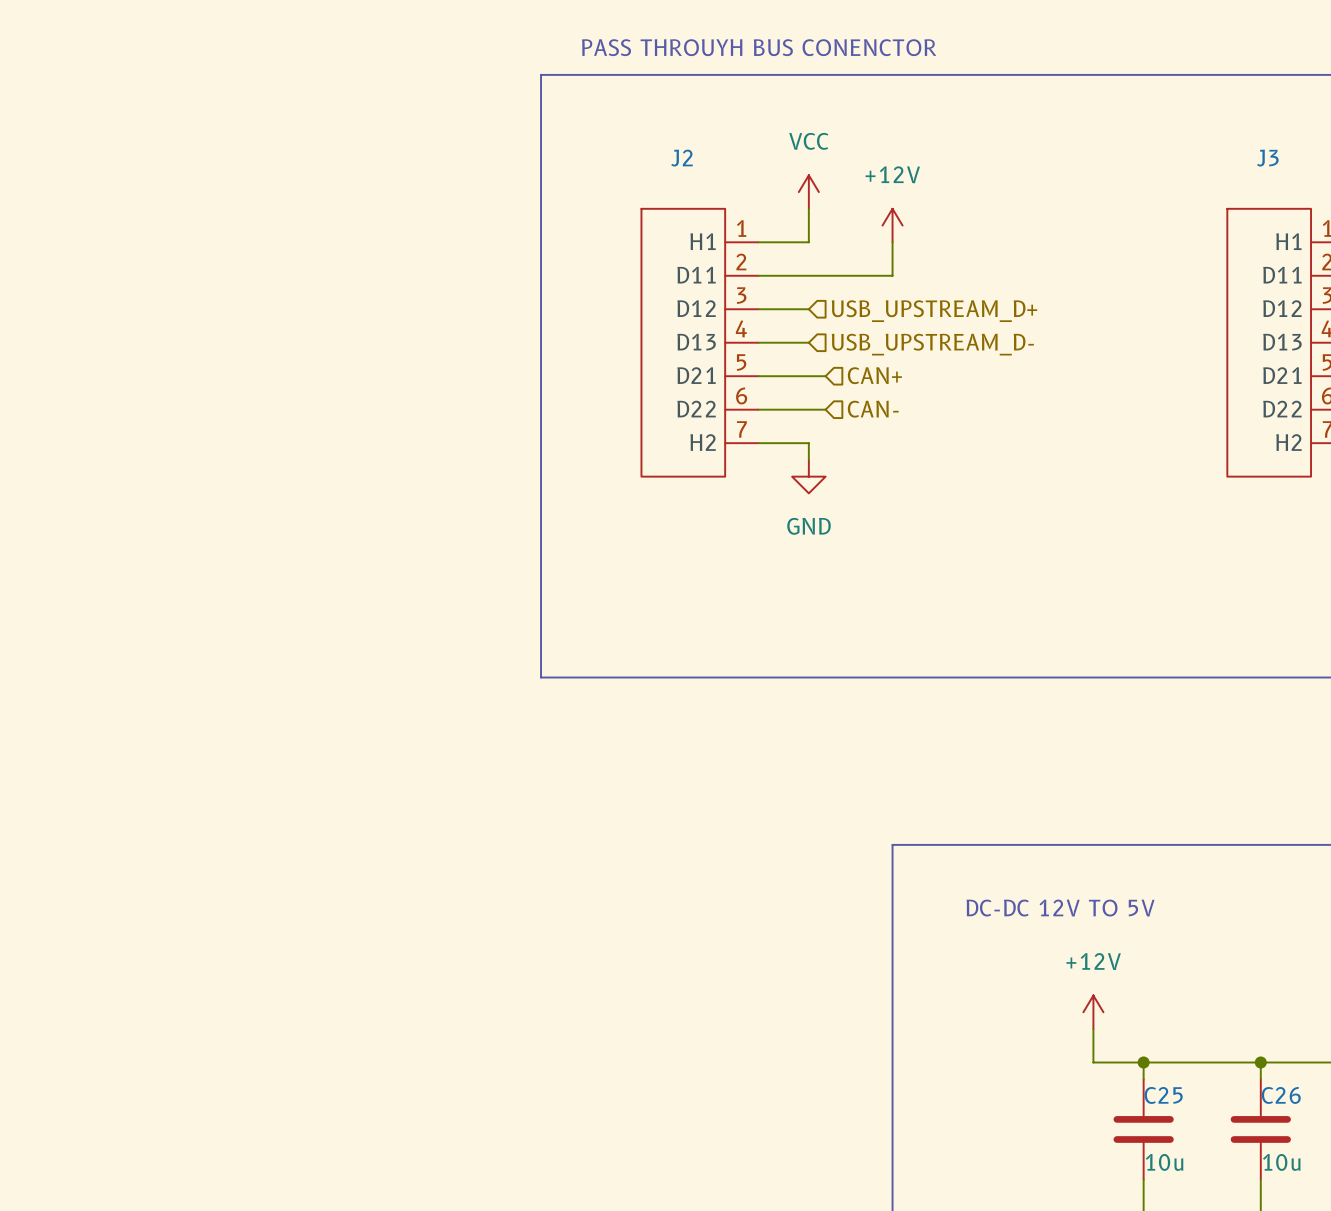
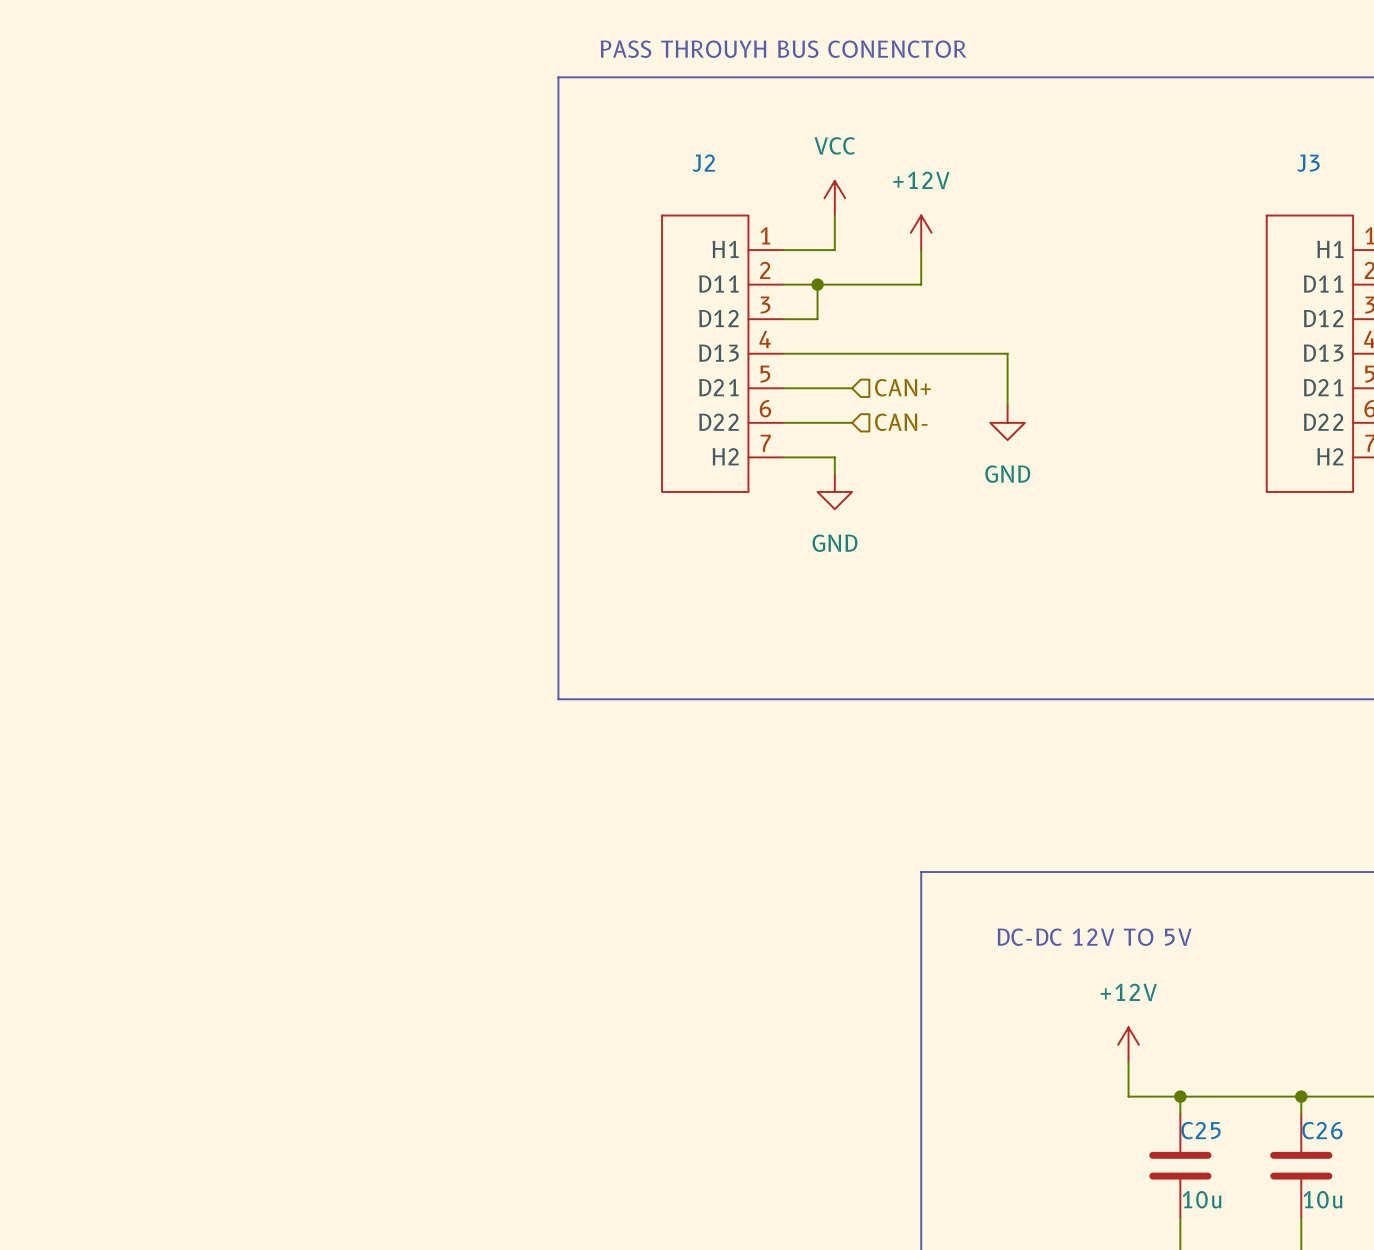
junction: none -> (817, 284)
wire: (792, 309) (808, 309) -> (817, 319) (817, 284)
hierarchical label: USB_UPSTREAM_D+ (934, 311) -> none
wire: none -> (834, 353) (1007, 353) (1007, 405)
hierarchical label: USB_UPSTREAM_D- (932, 344) -> none
power symbol: none -> GND (1007, 422)

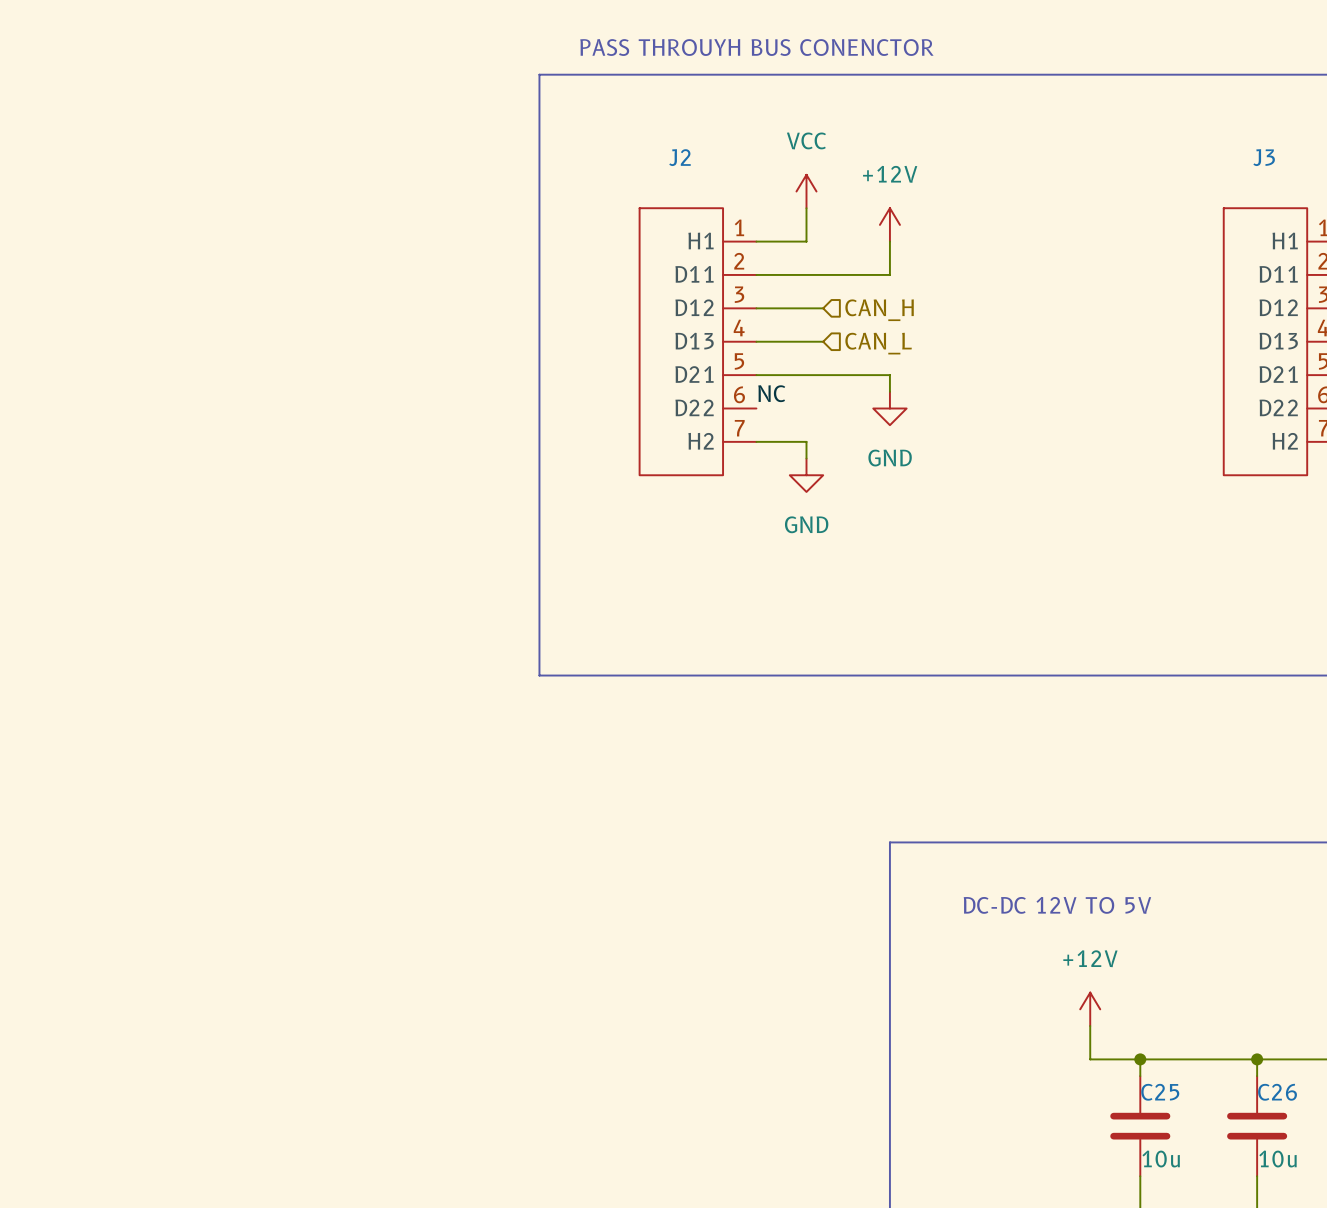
wire: (817, 284) (817, 319) -> (823, 308) (789, 308)
junction: (817, 284) -> none
hierarchical label: none -> CAN_H (879, 310)
wire: (852, 353) (1007, 353) (1007, 405) -> none
hierarchical label: CAN+ (902, 387) -> CAN_L (878, 343)
wire: none -> (823, 375) (889, 375) (889, 391)
label: none -> NC (771, 393)
wire: (783, 422) (852, 422) -> none
hierarchical label: CAN- (901, 422) -> none
power symbol position: GND (1007, 422) -> GND (889, 408)

